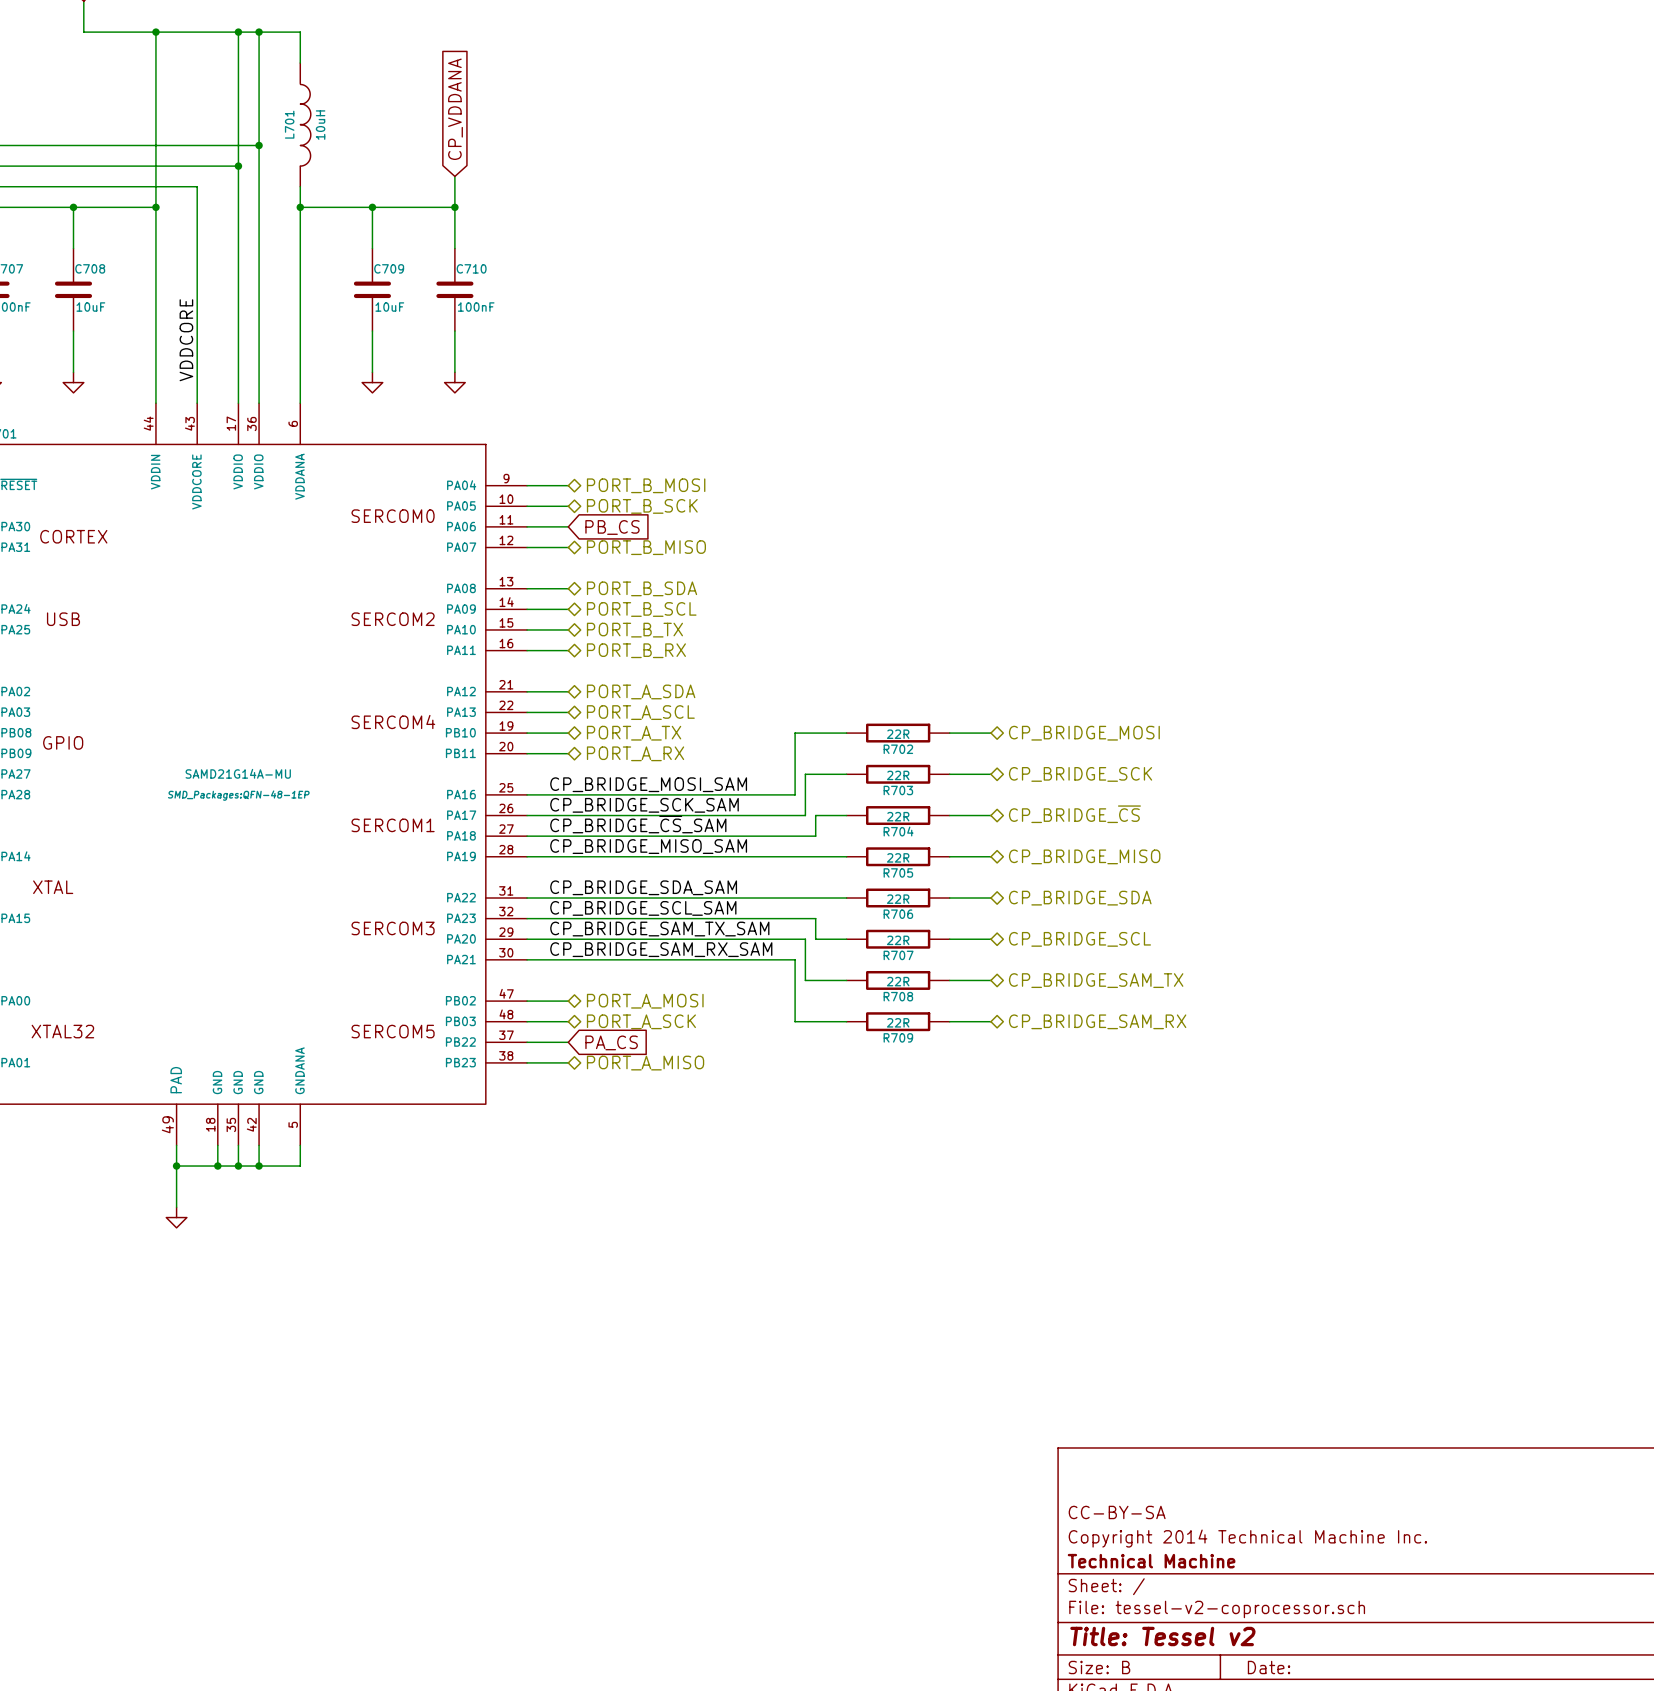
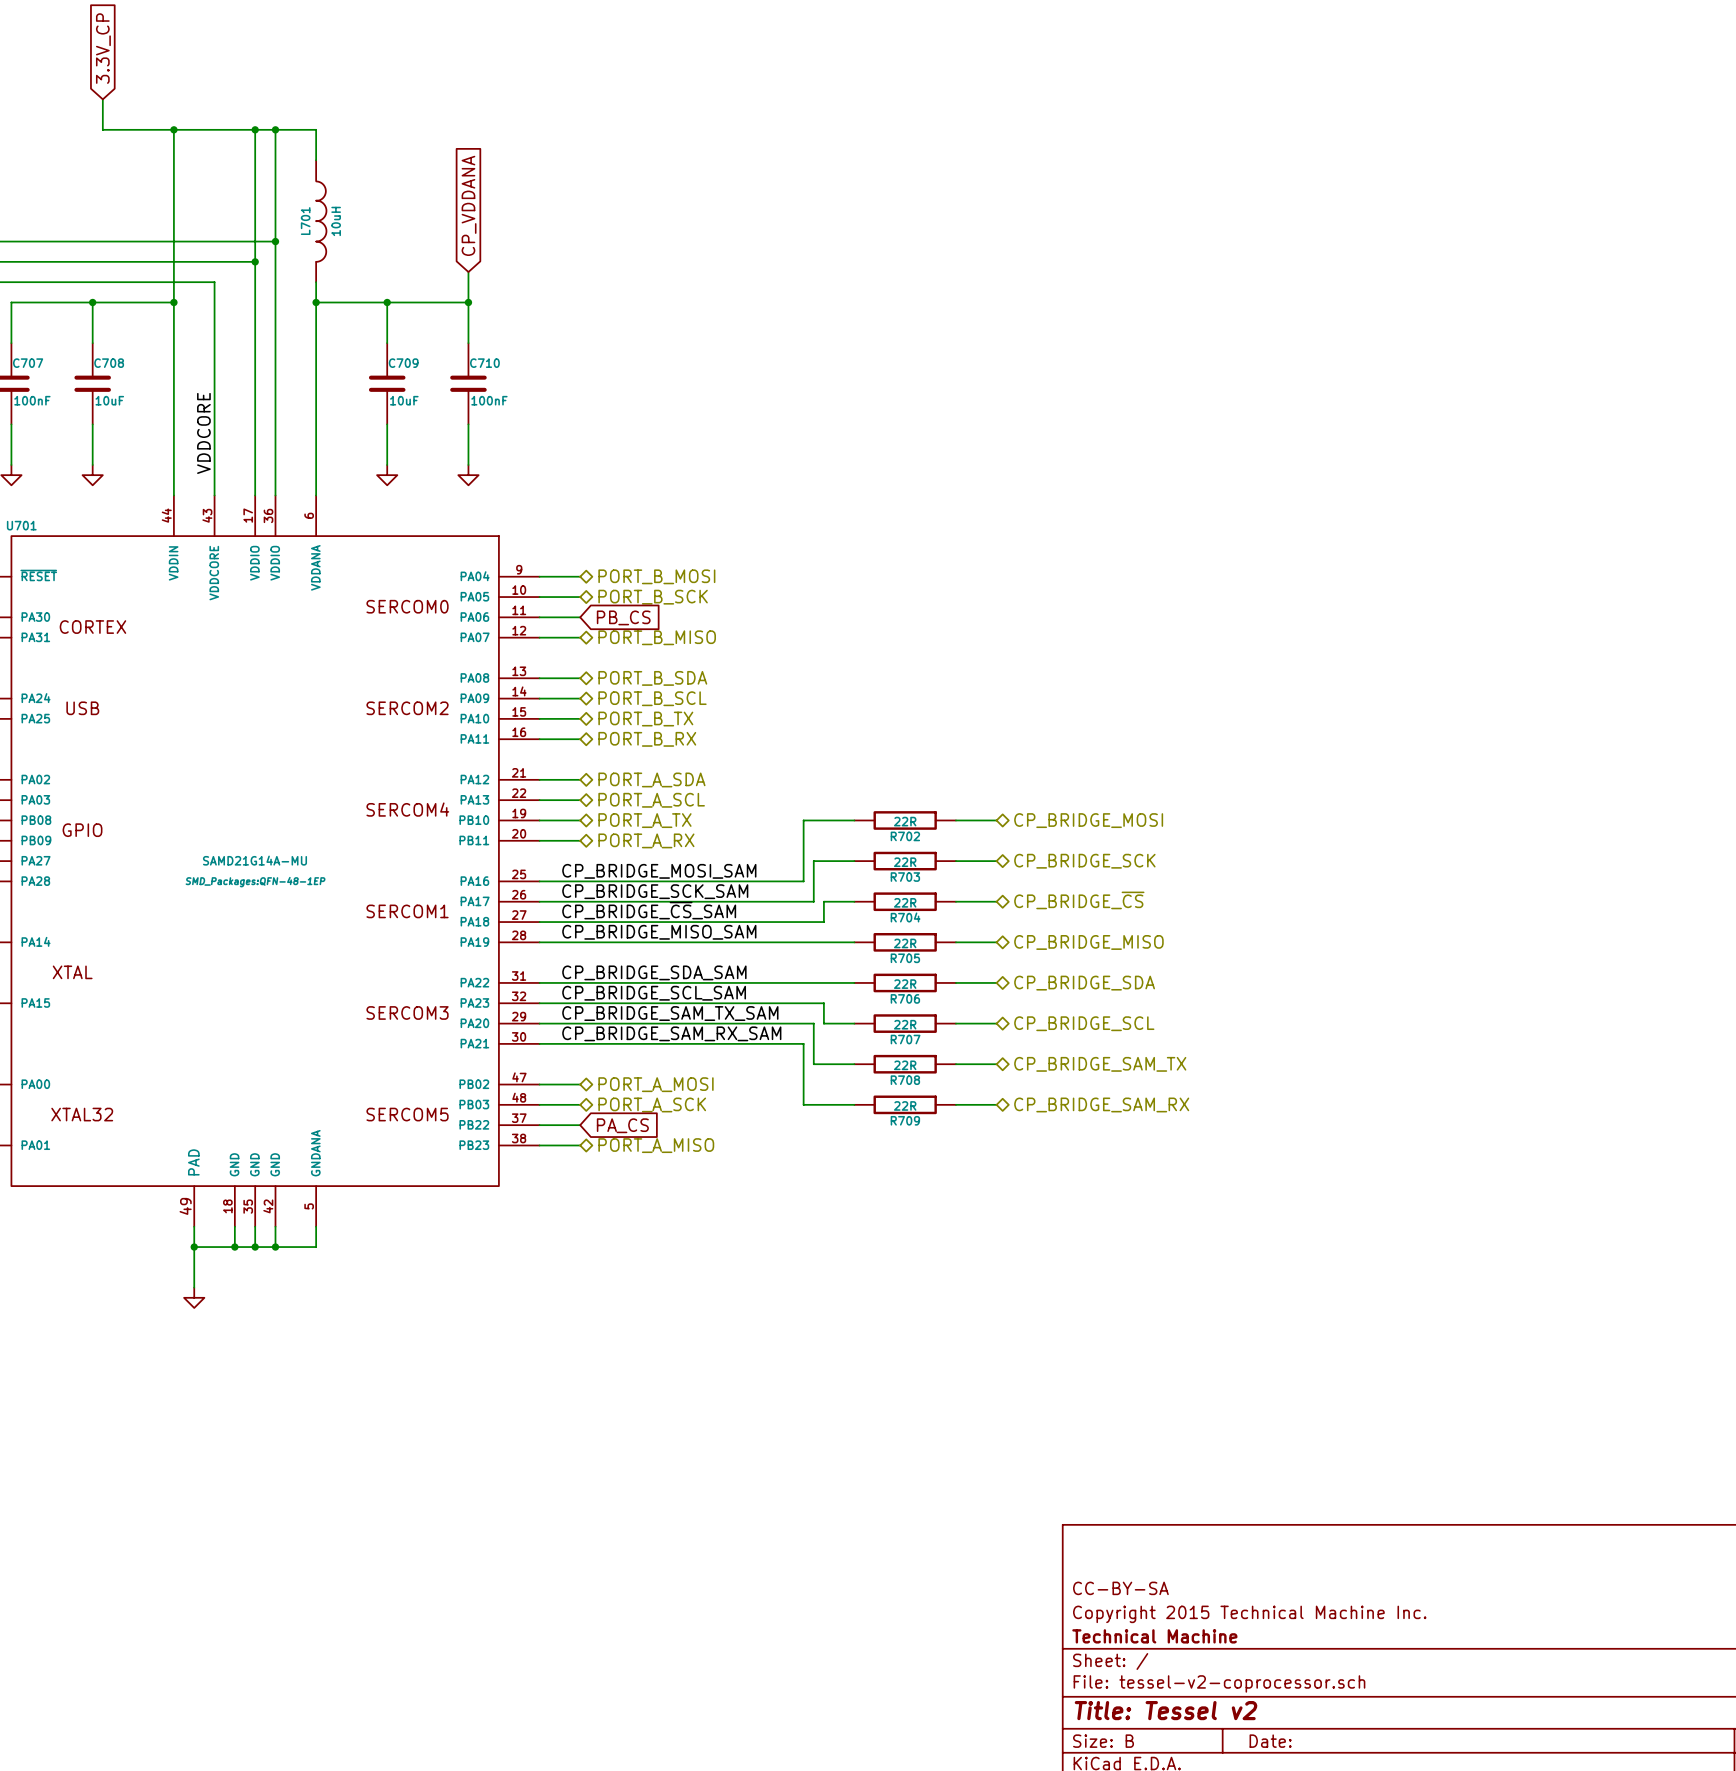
title block: Copyright 2014 Technical Machine Inc. (1247, 1538) -> Copyright 2015 Technical Machine Inc. (1249, 1614)

